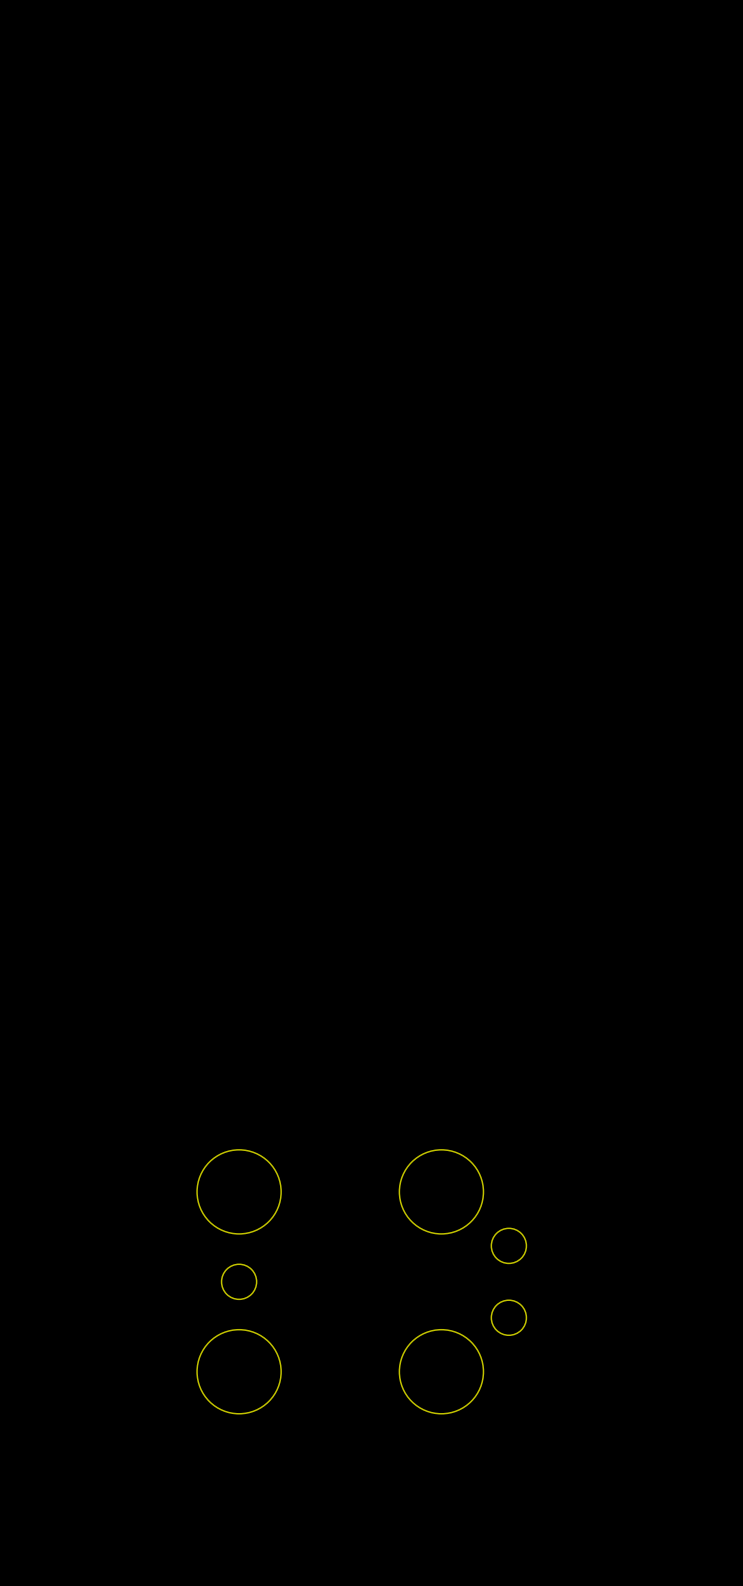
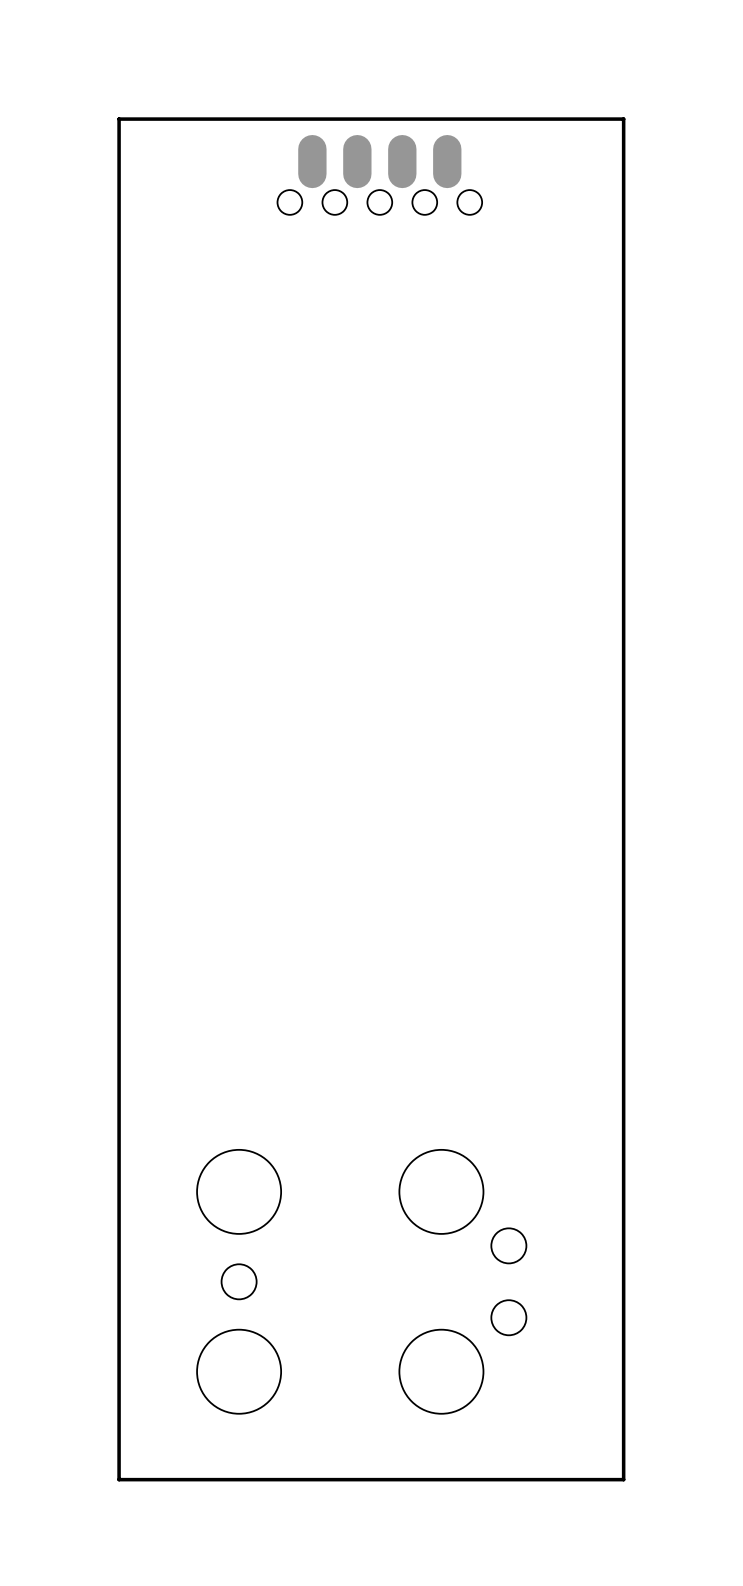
board edge: none -> (623, 119) (119, 119) (119, 1479) (623, 1479) (623, 119)
part: none -> (379, 174)

